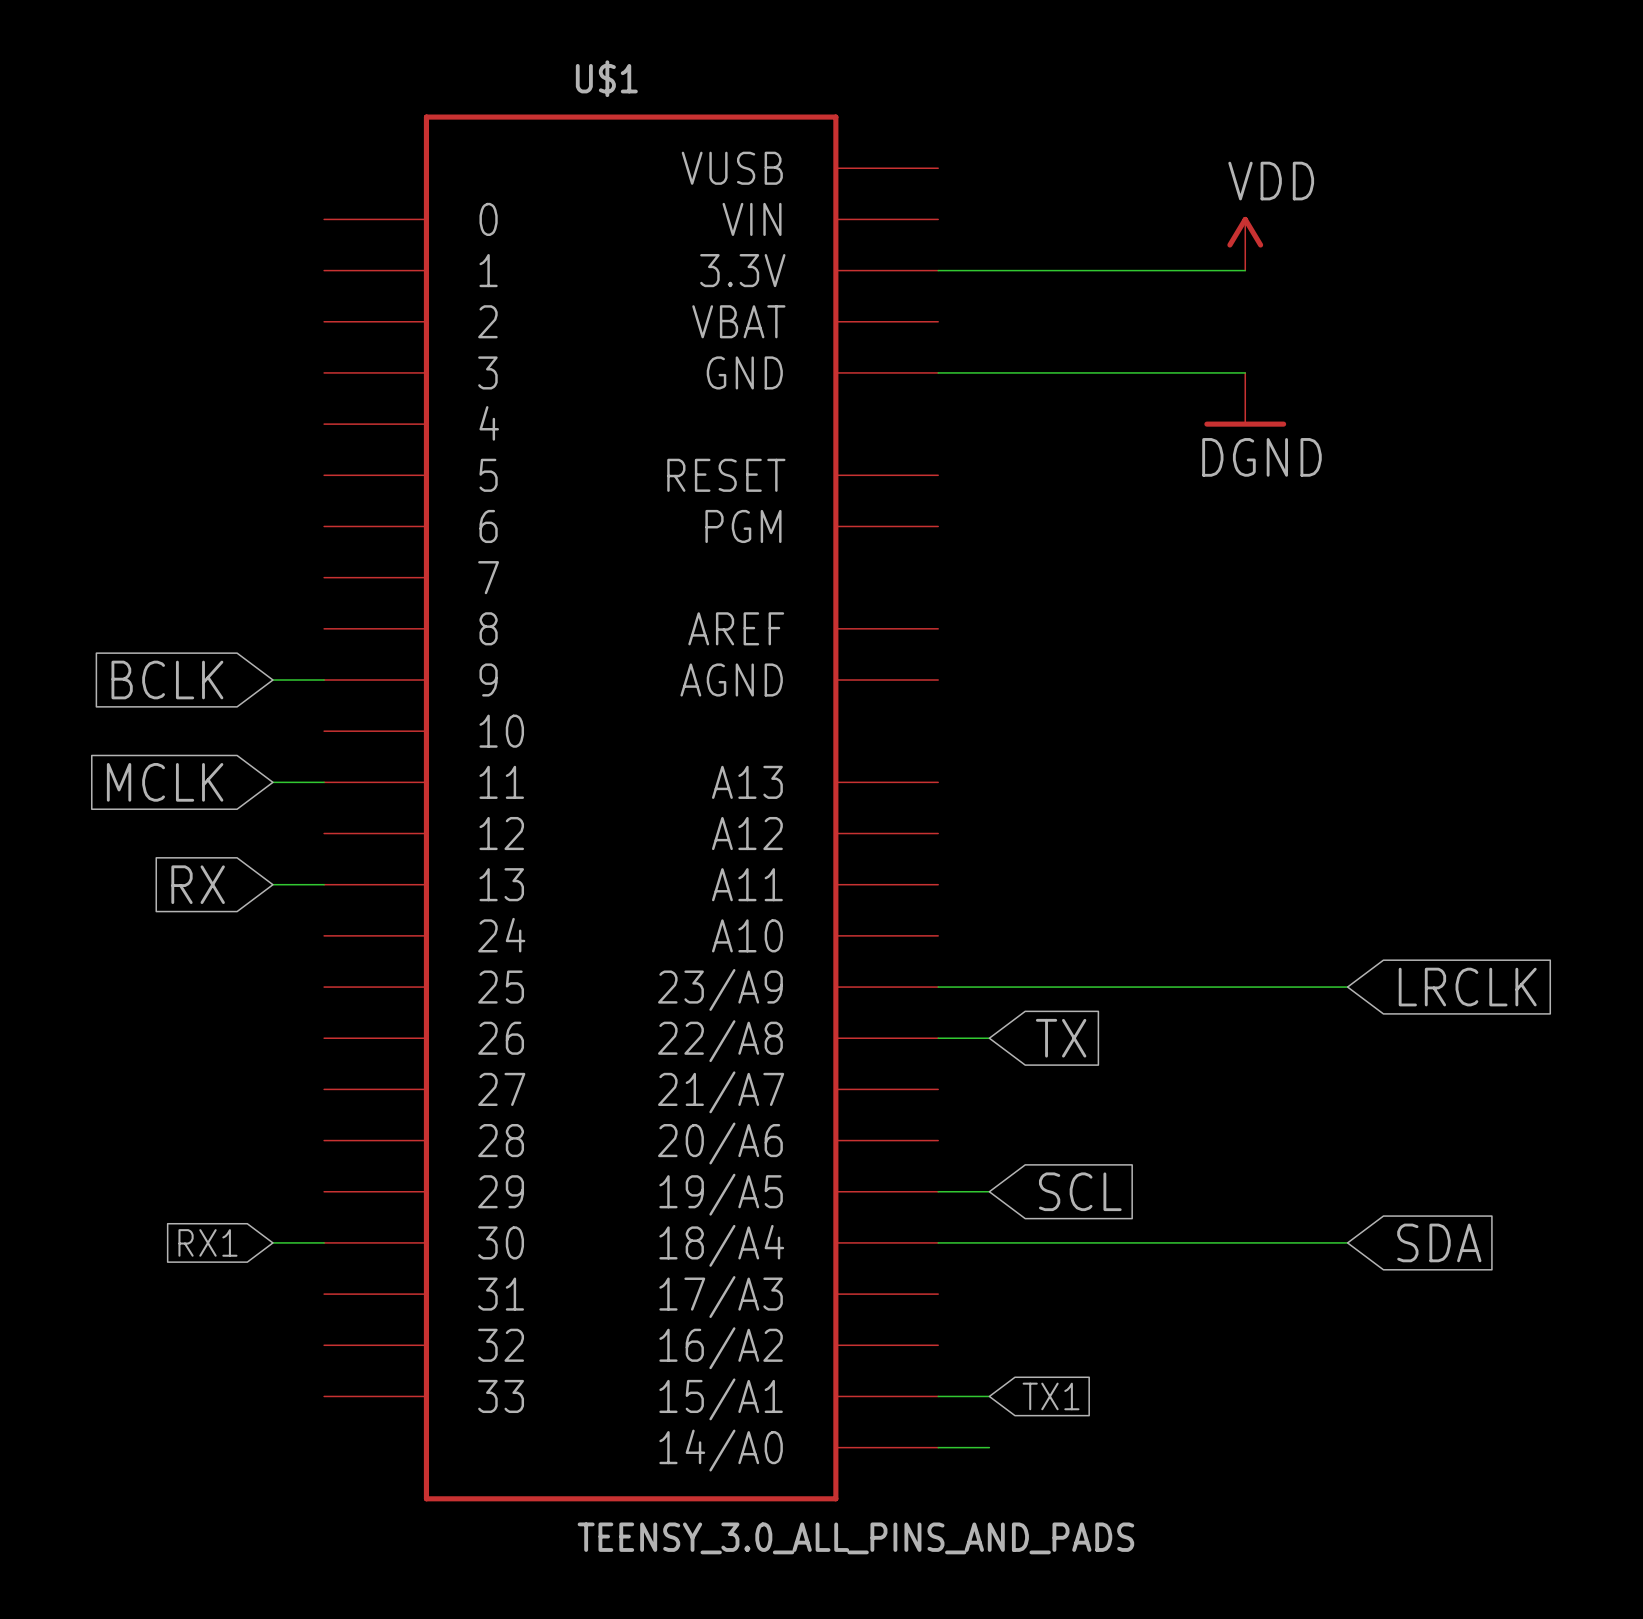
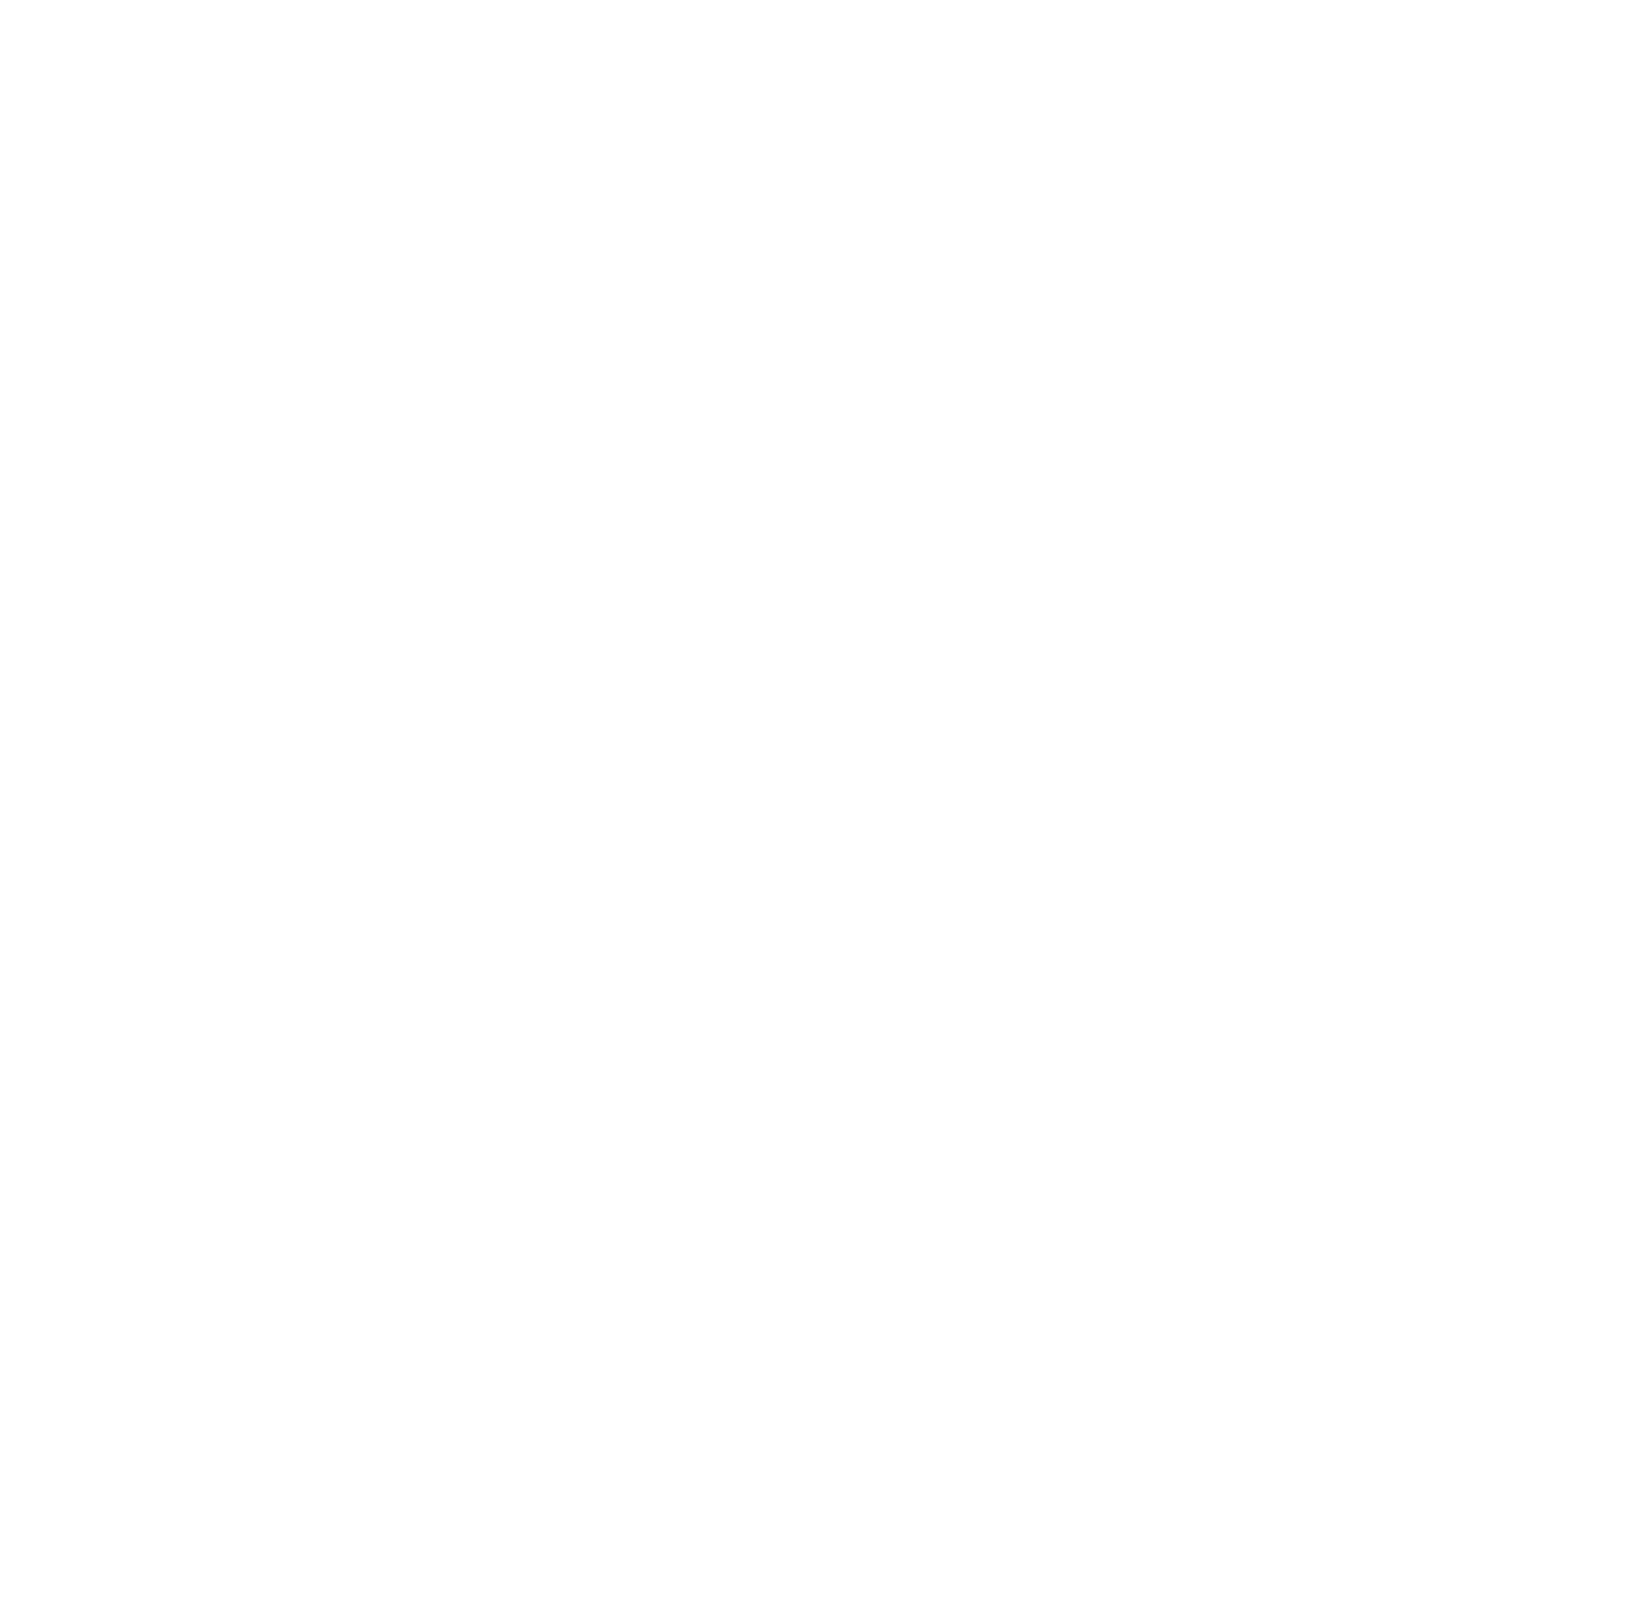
power symbol: VDD (1245, 243) -> none
wire: (938, 270) (1245, 270) -> none
wire: (938, 372) (1245, 372) -> none
power symbol: DGND (1245, 399) -> none
global label: BCLK (167, 680) -> none
wire: (272, 680) (324, 680) -> none
global label: MCLK (165, 782) -> none
wire: (272, 782) (324, 782) -> none
U$1: TEENSY_3.0_ALL_PINS_AND_PADS (631, 807) -> none
global label: RX (198, 884) -> none
wire: (272, 884) (324, 884) -> none
wire: (938, 987) (1347, 987) -> none
global label: LRCLK (1467, 987) -> none
wire: (938, 1038) (989, 1038) -> none
global label: TX (1061, 1038) -> none
wire: (938, 1191) (989, 1191) -> none
global label: SCL (1080, 1191) -> none
global label: RX1 (207, 1242) -> none
wire: (272, 1242) (324, 1242) -> none
wire: (938, 1242) (1347, 1242) -> none
global label: SDA (1439, 1242) -> none
wire: (938, 1396) (989, 1396) -> none
global label: TX1 (1051, 1396) -> none
wire: (938, 1447) (989, 1447) -> none

